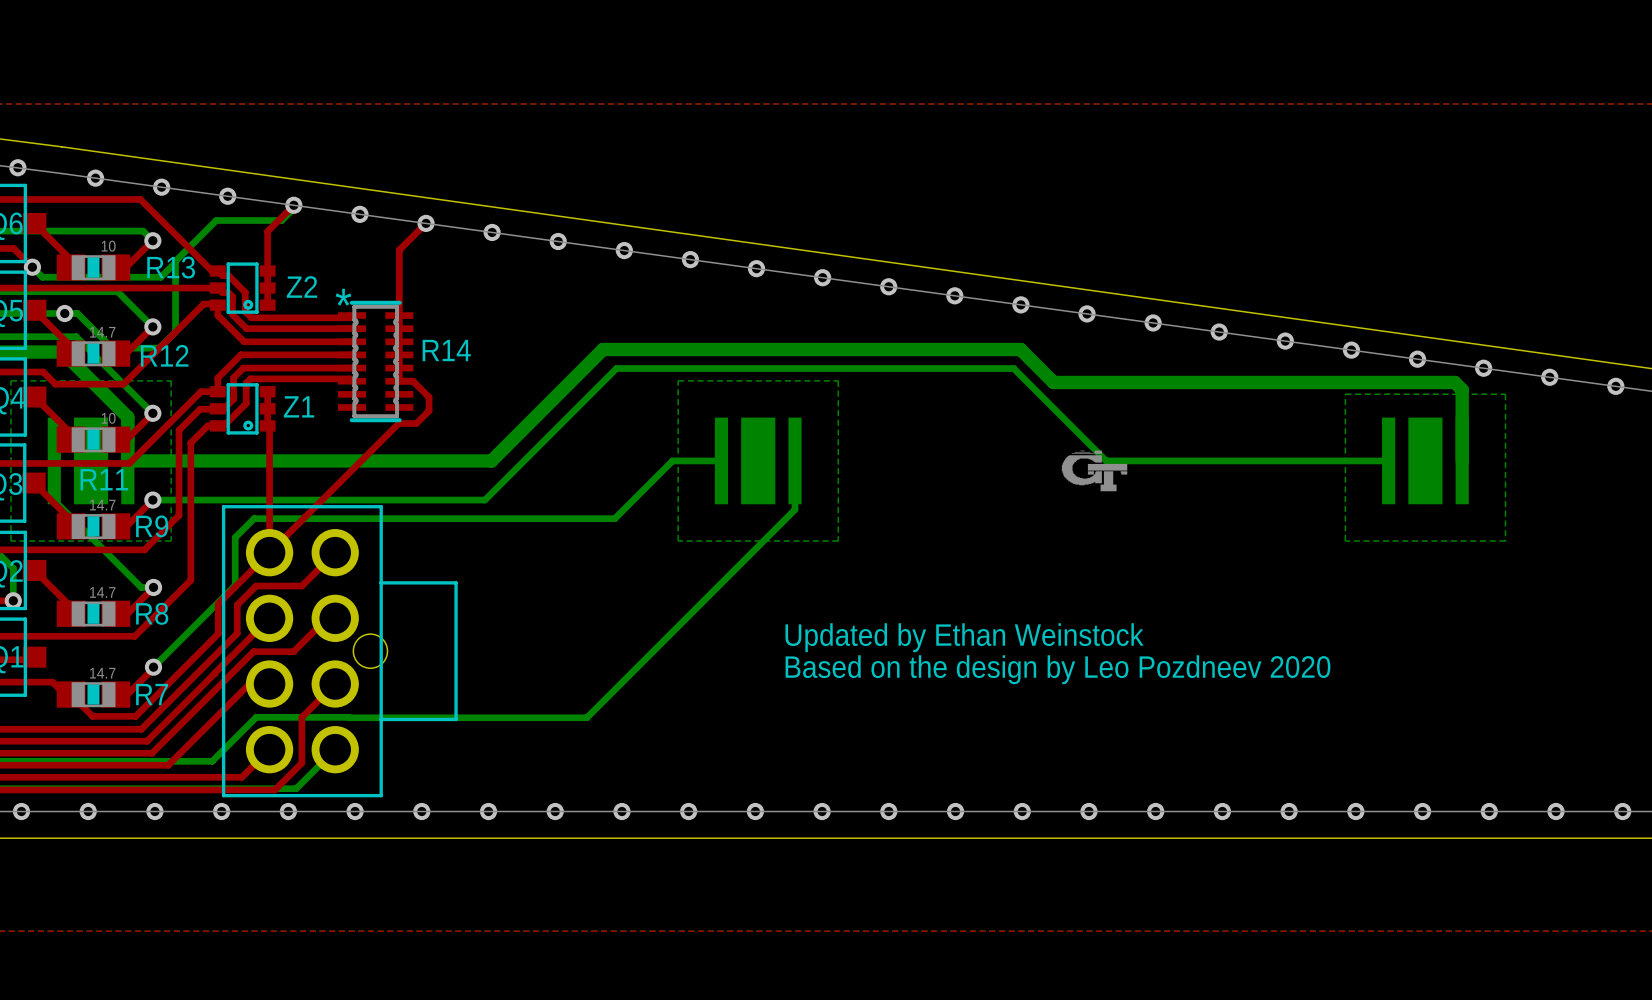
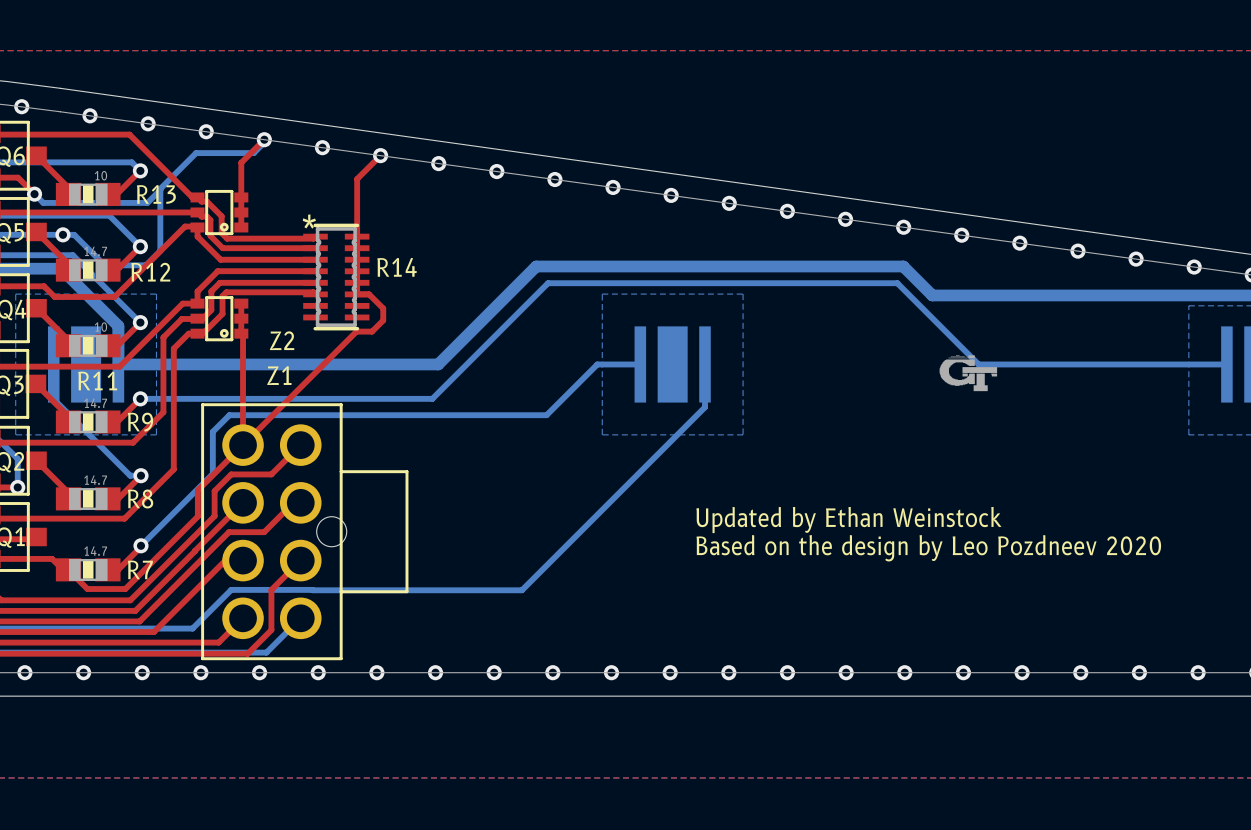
text position: Z2 (301, 286) -> Z2 (282, 340)
text position: Z1 (299, 406) -> Z1 (279, 375)

